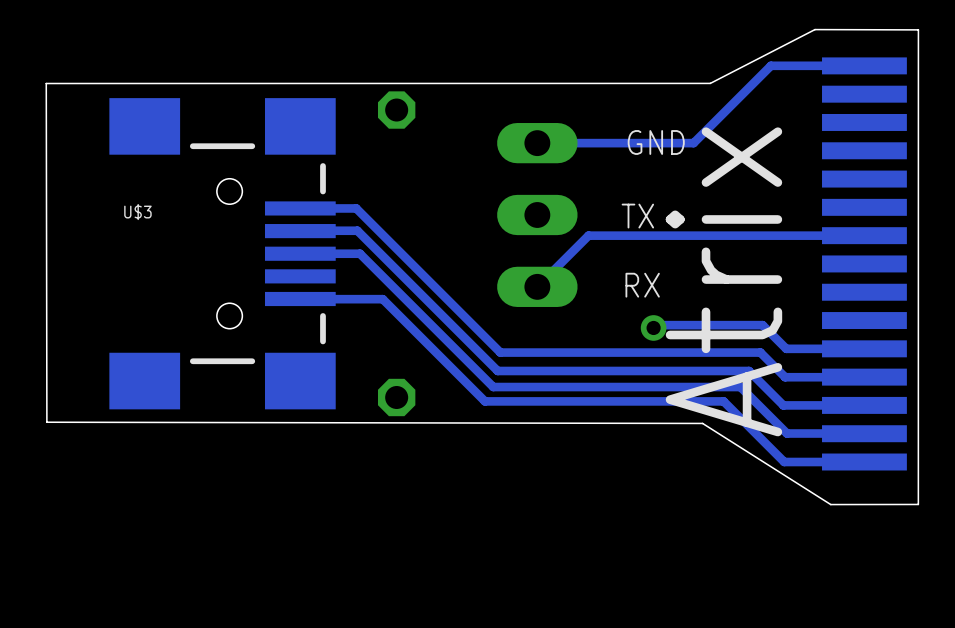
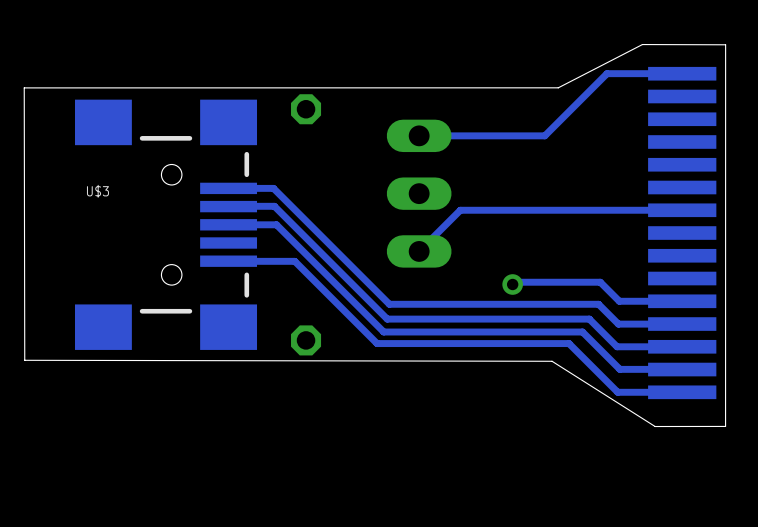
text: GND (656, 142) -> none
text: TX (637, 216) -> none
text: Atrix (723, 281) -> none
text: RX (642, 285) -> none

